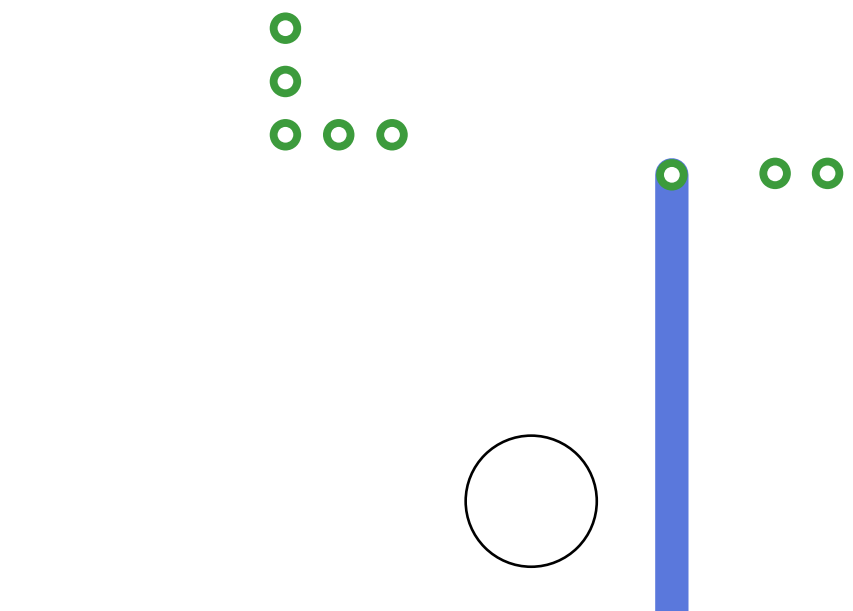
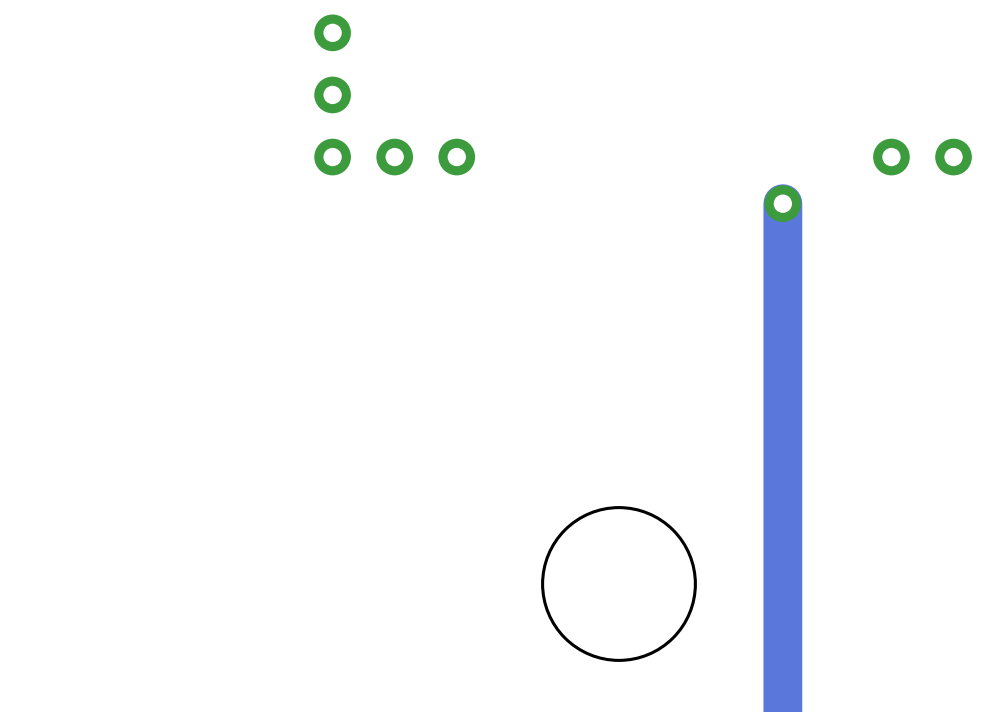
via: none -> (891, 157)
via: none -> (953, 157)
via: (775, 173) -> none
via: (827, 173) -> none

